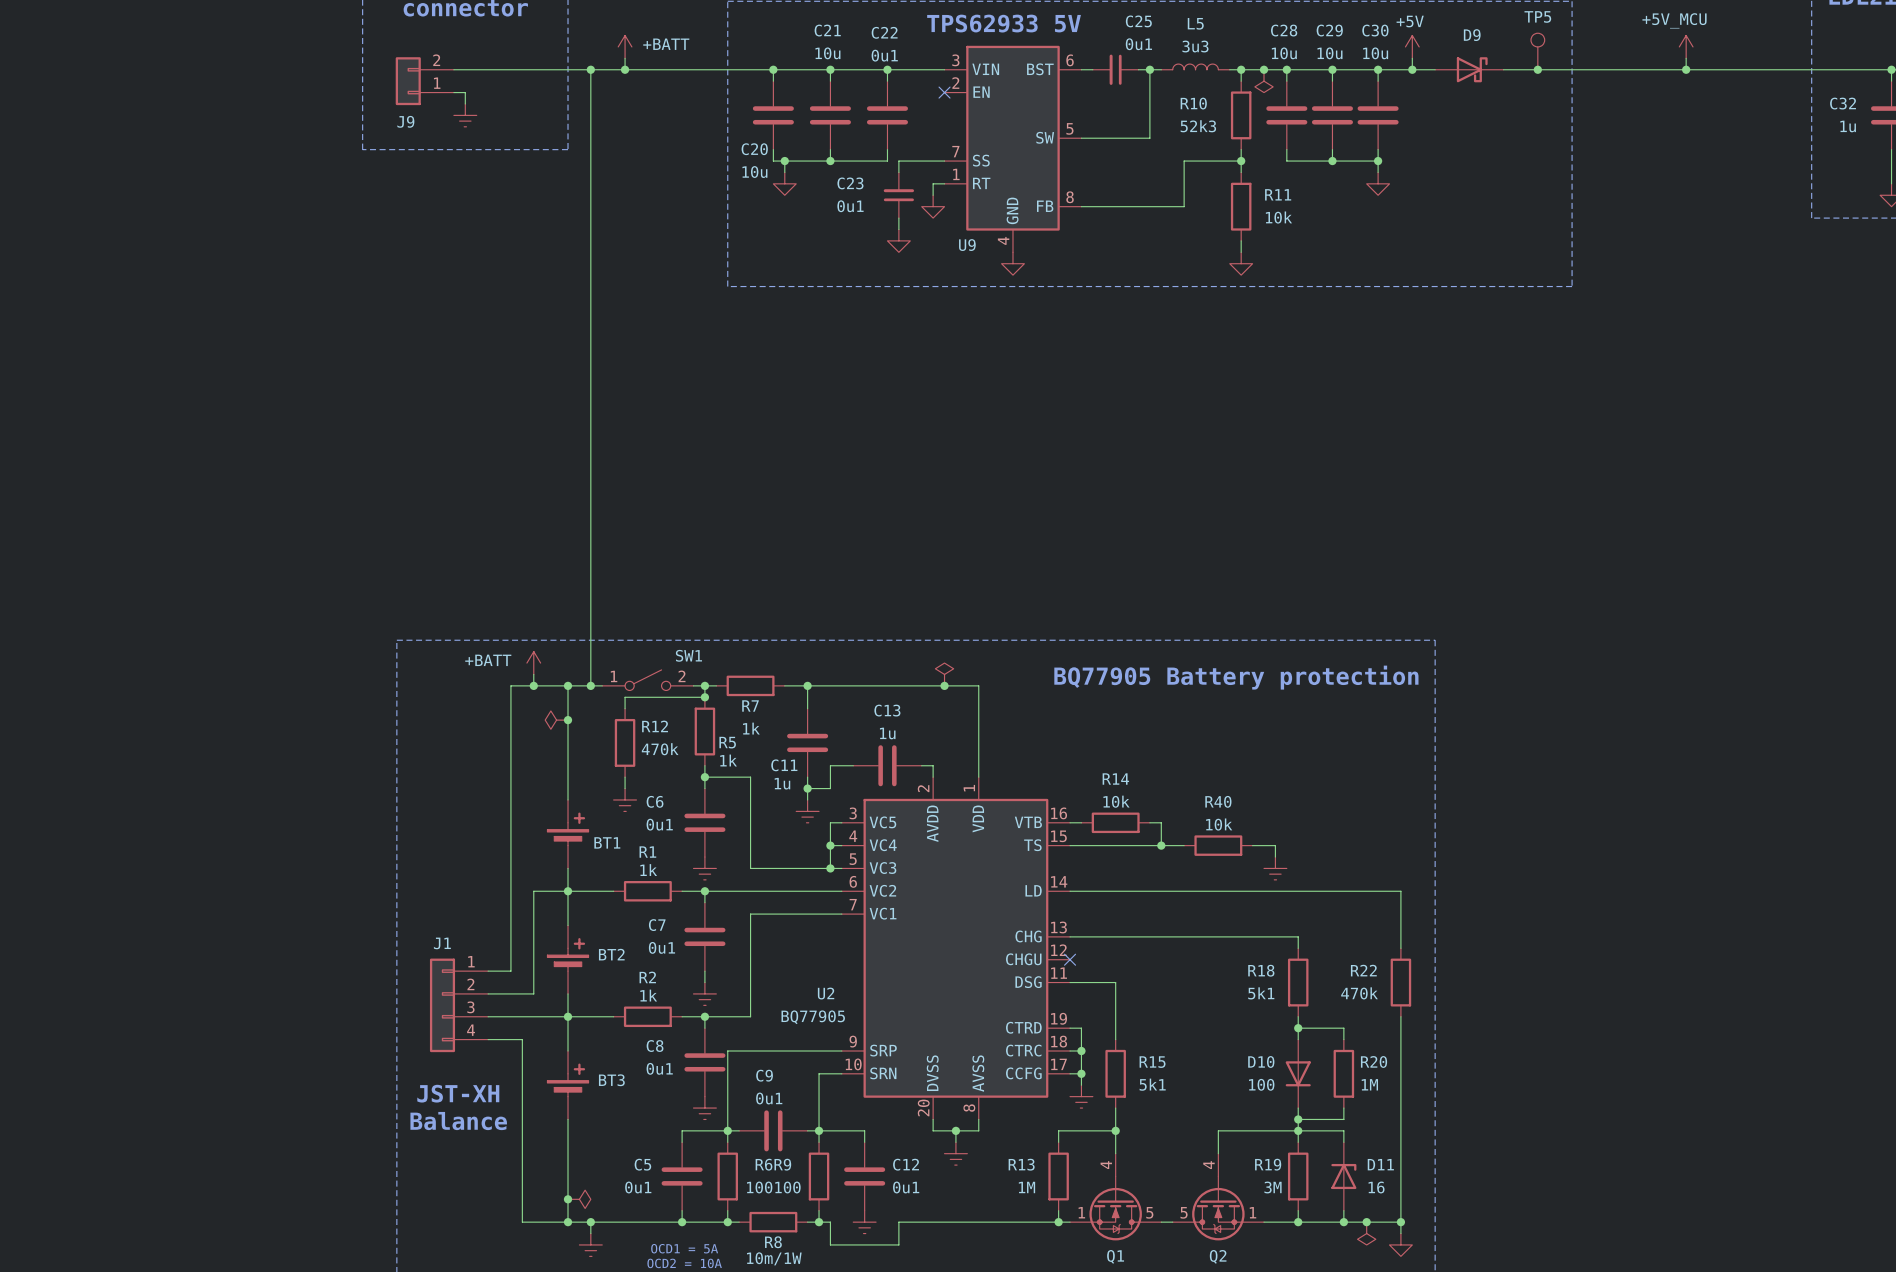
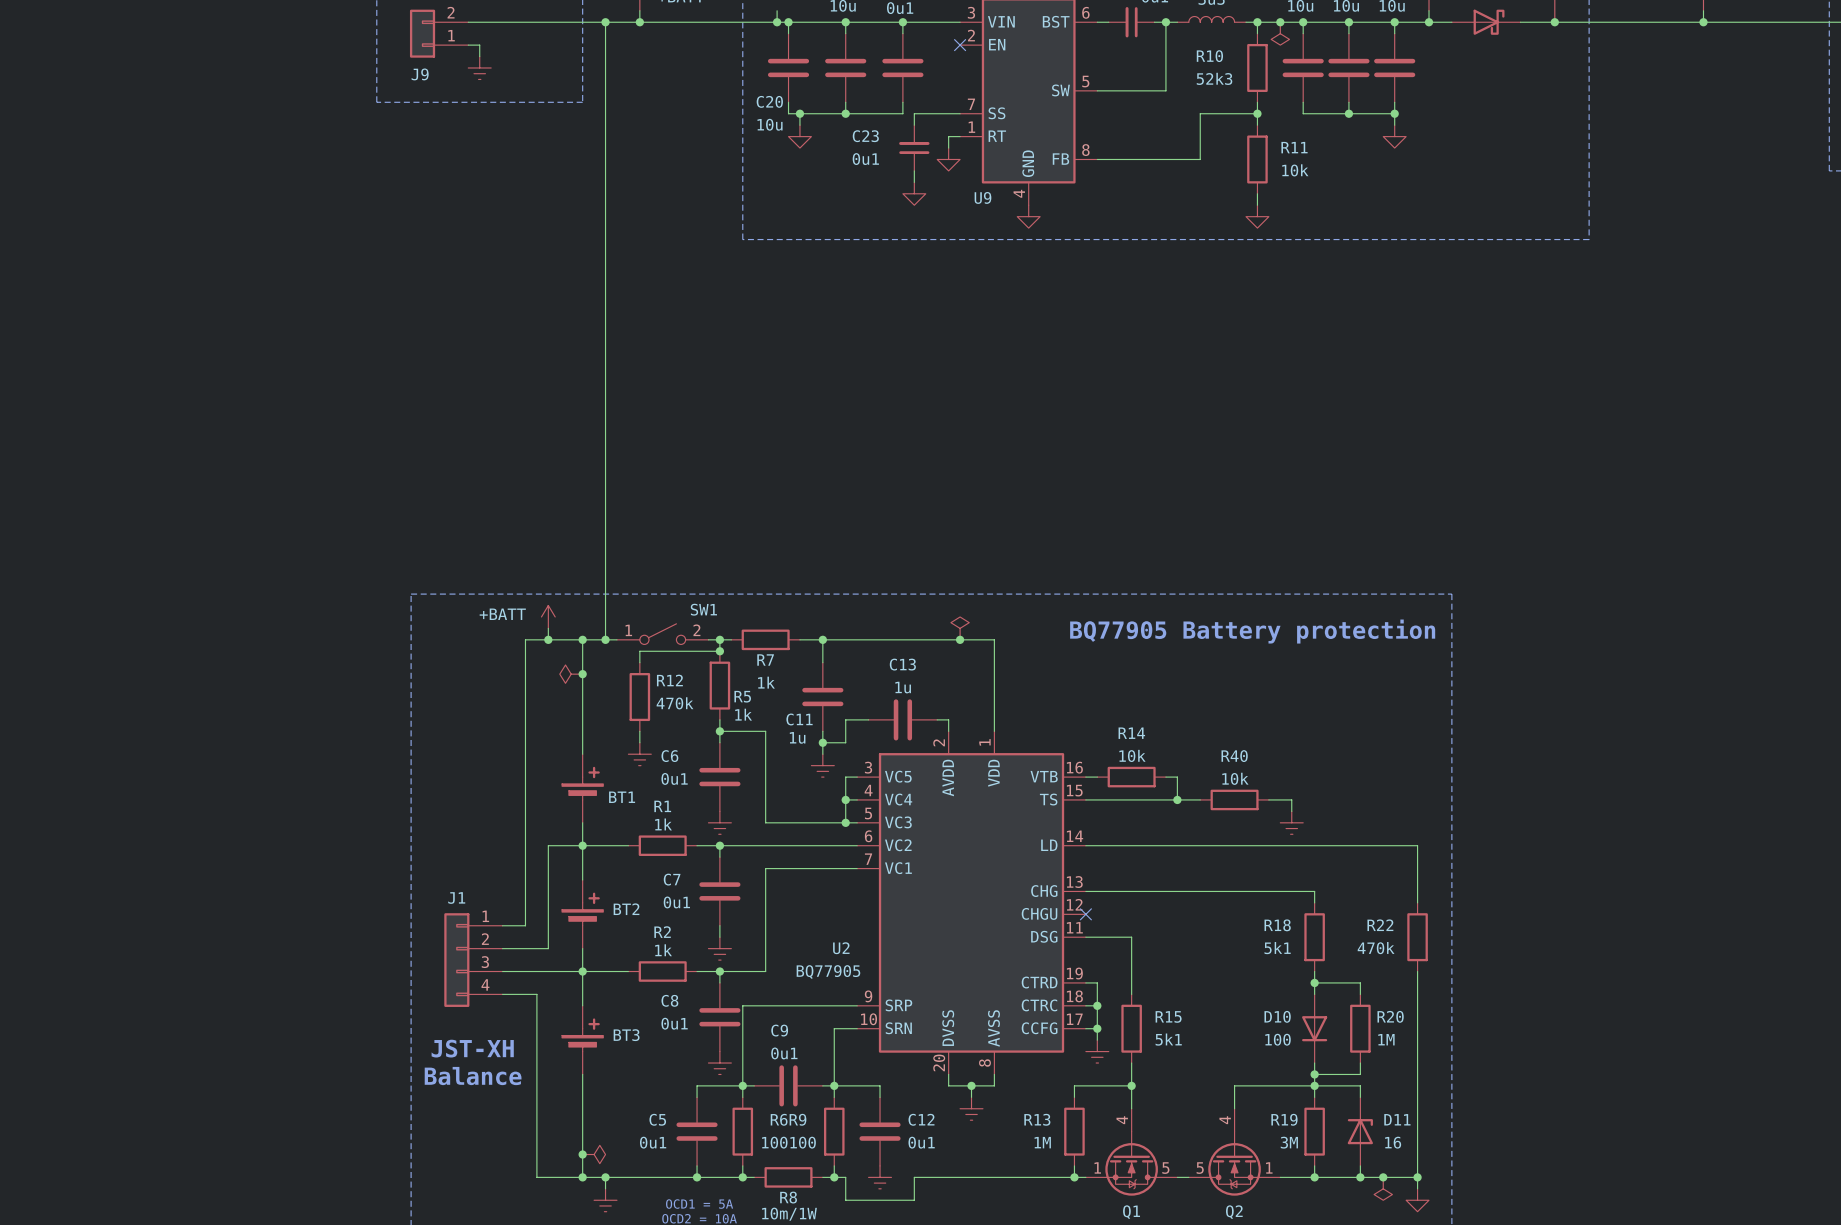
wire: none -> (777, 10) (777, 22)
junction: none -> (777, 22)

